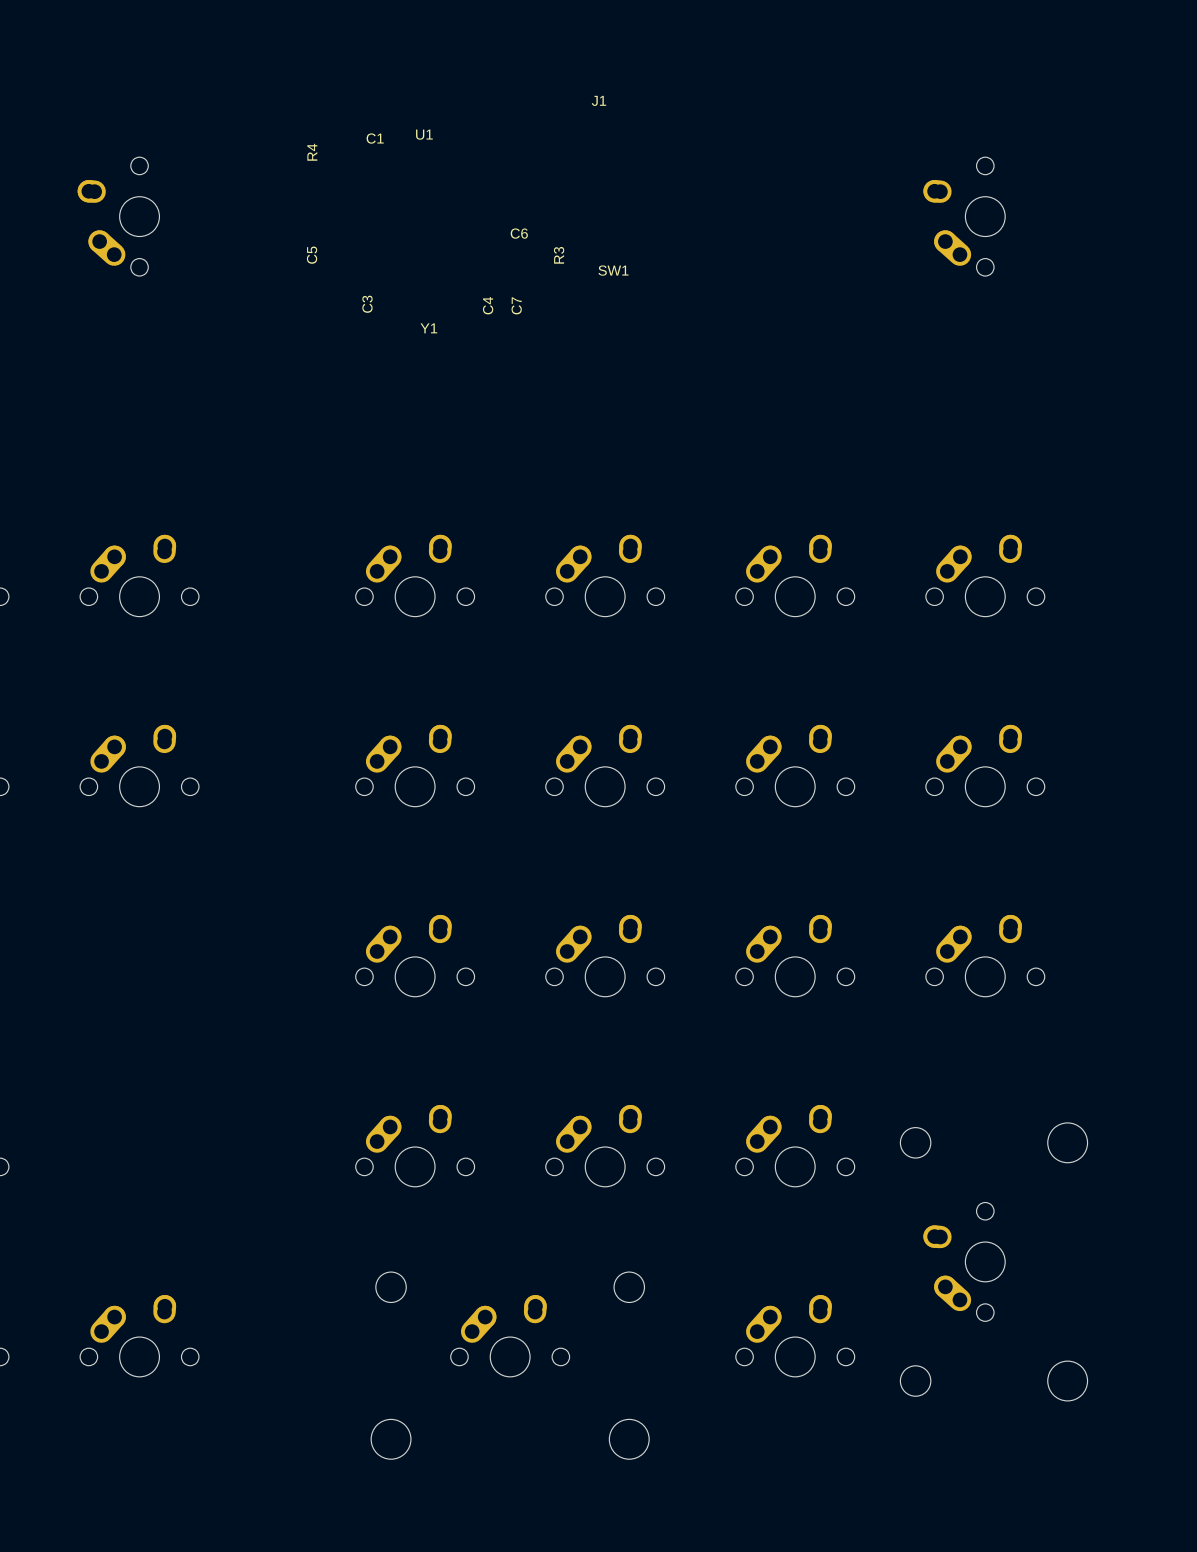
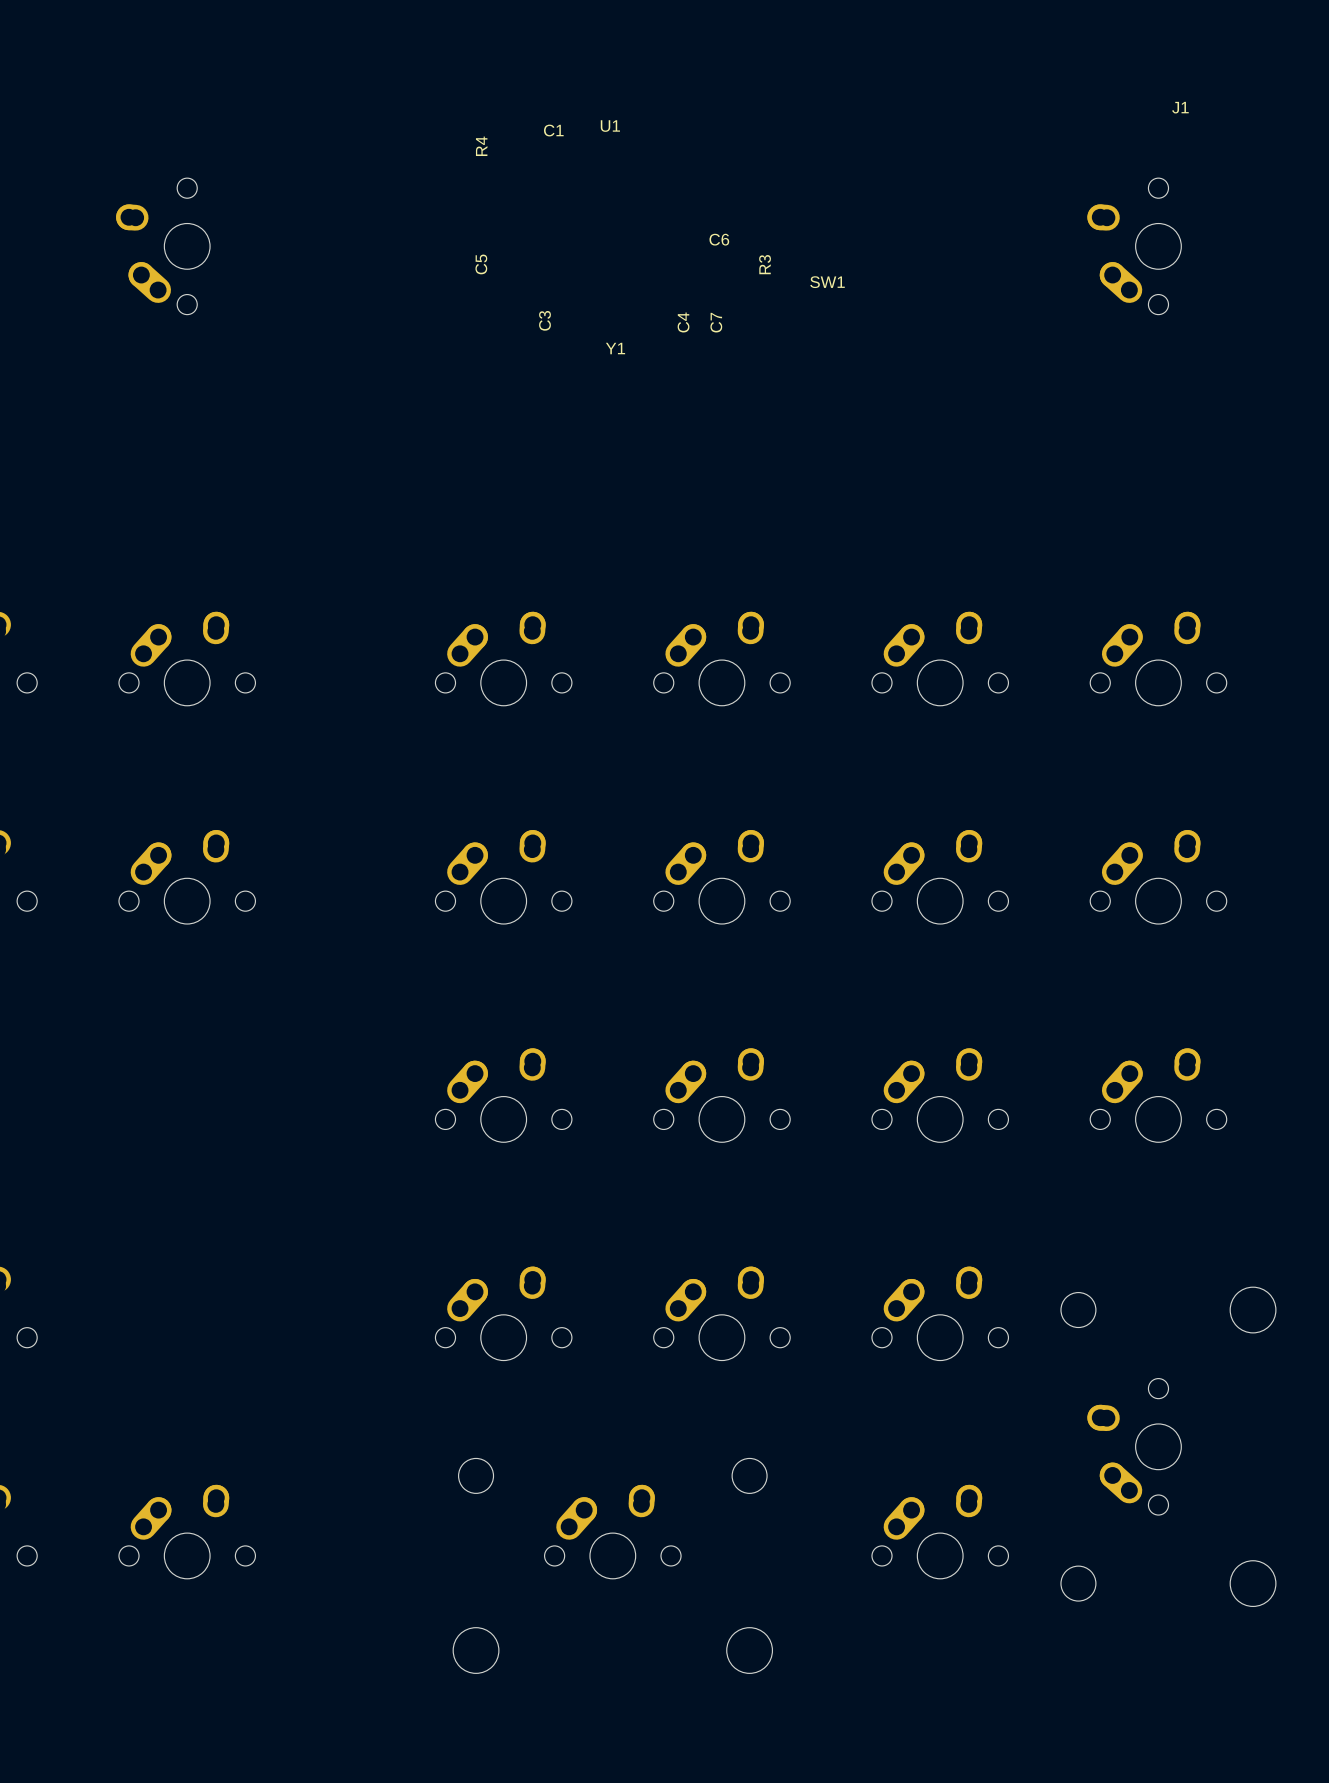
J1 position: (598, 100) -> (1180, 107)
U1 position: (424, 134) -> (610, 126)
C1 position: (375, 138) -> (553, 130)
R4 position: (312, 152) -> (481, 146)
C6 position: (519, 233) -> (719, 239)
C5 position: (312, 255) -> (481, 264)
R3 position: (559, 255) -> (765, 264)
SW1 position: (613, 270) -> (827, 282)
C3 position: (367, 304) -> (544, 320)
C4 position: (488, 305) -> (683, 322)
C7 position: (516, 305) -> (716, 322)
Y1 position: (428, 328) -> (615, 348)

